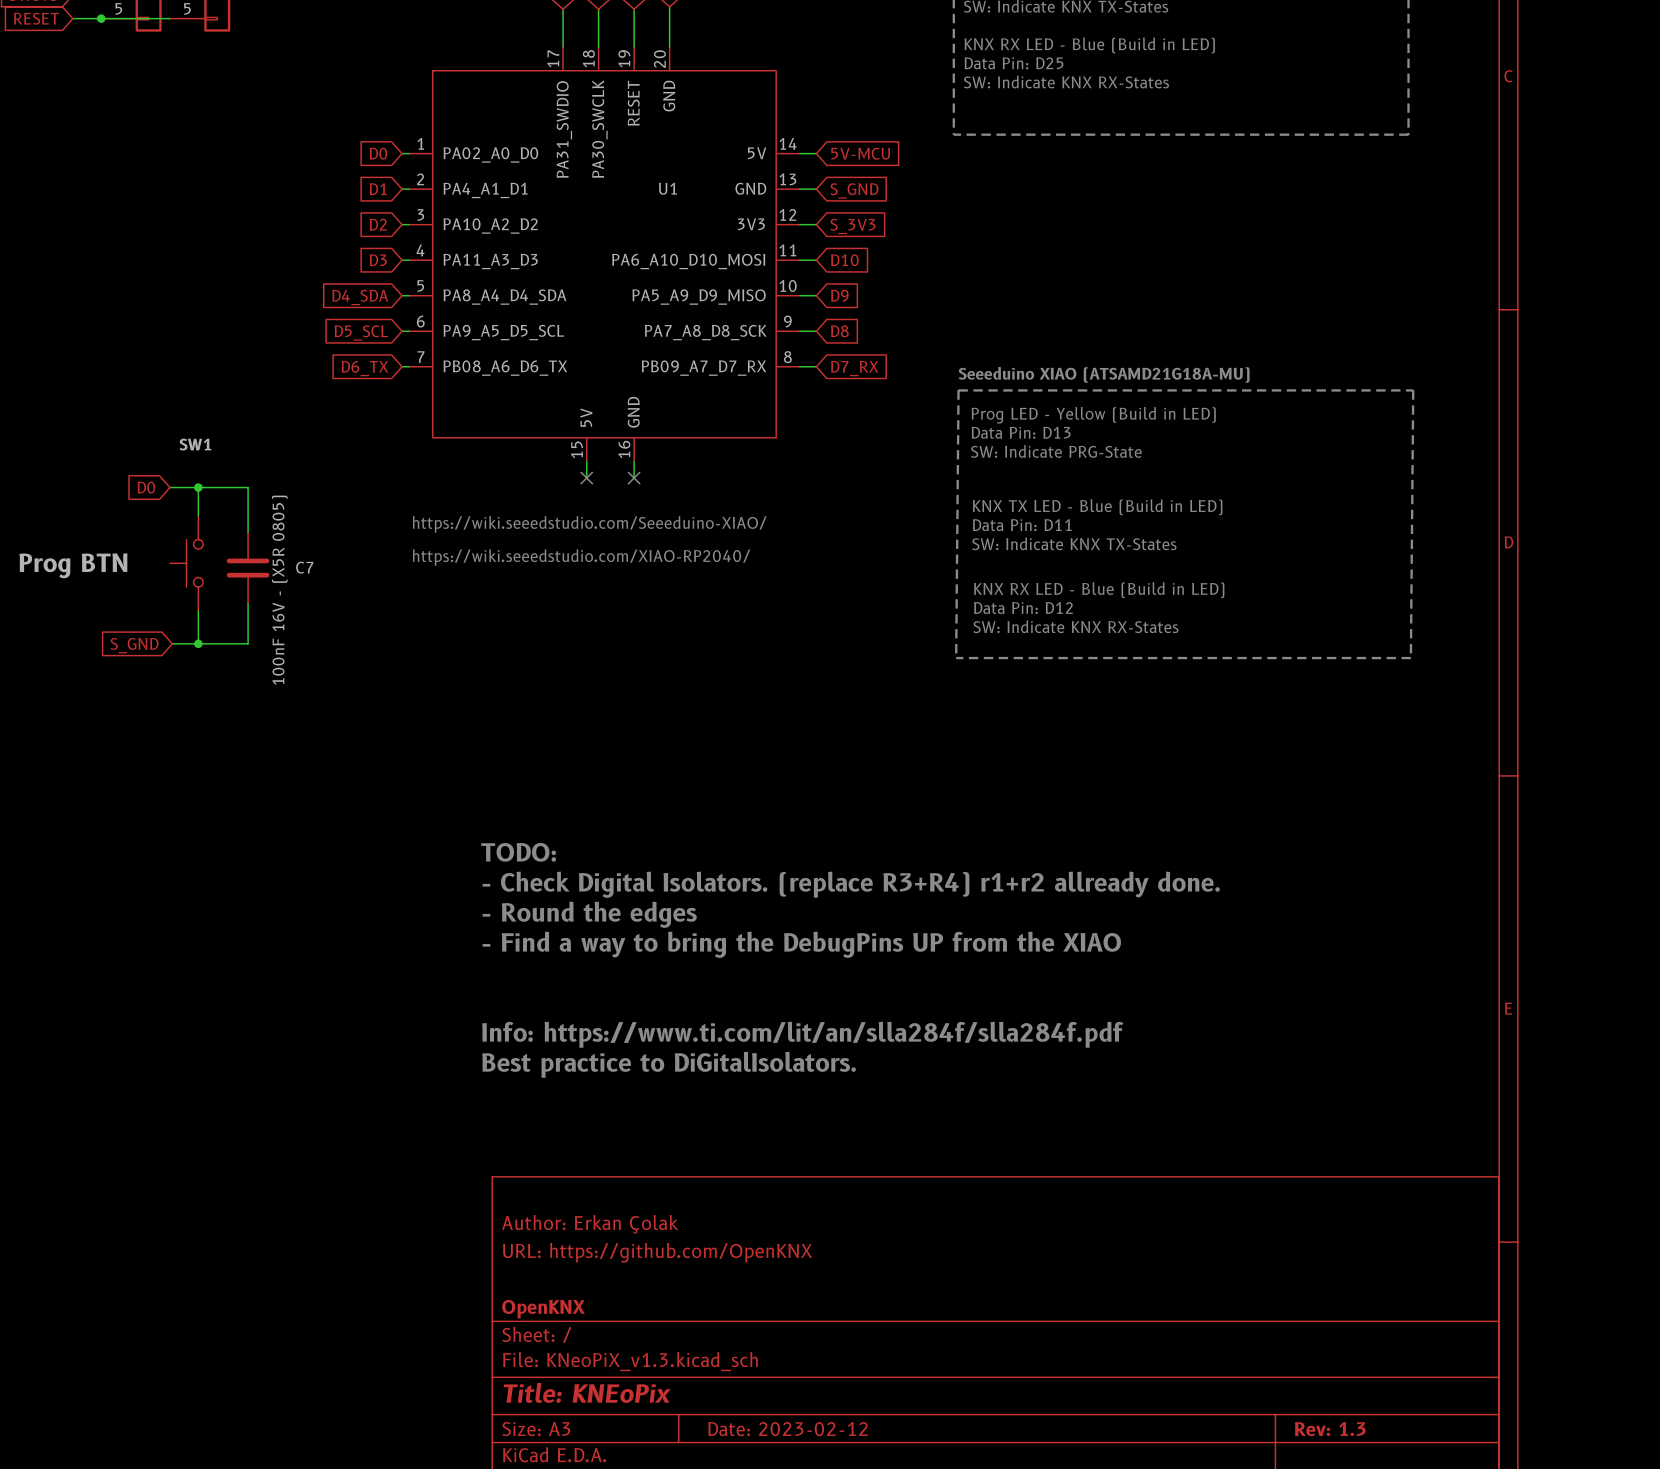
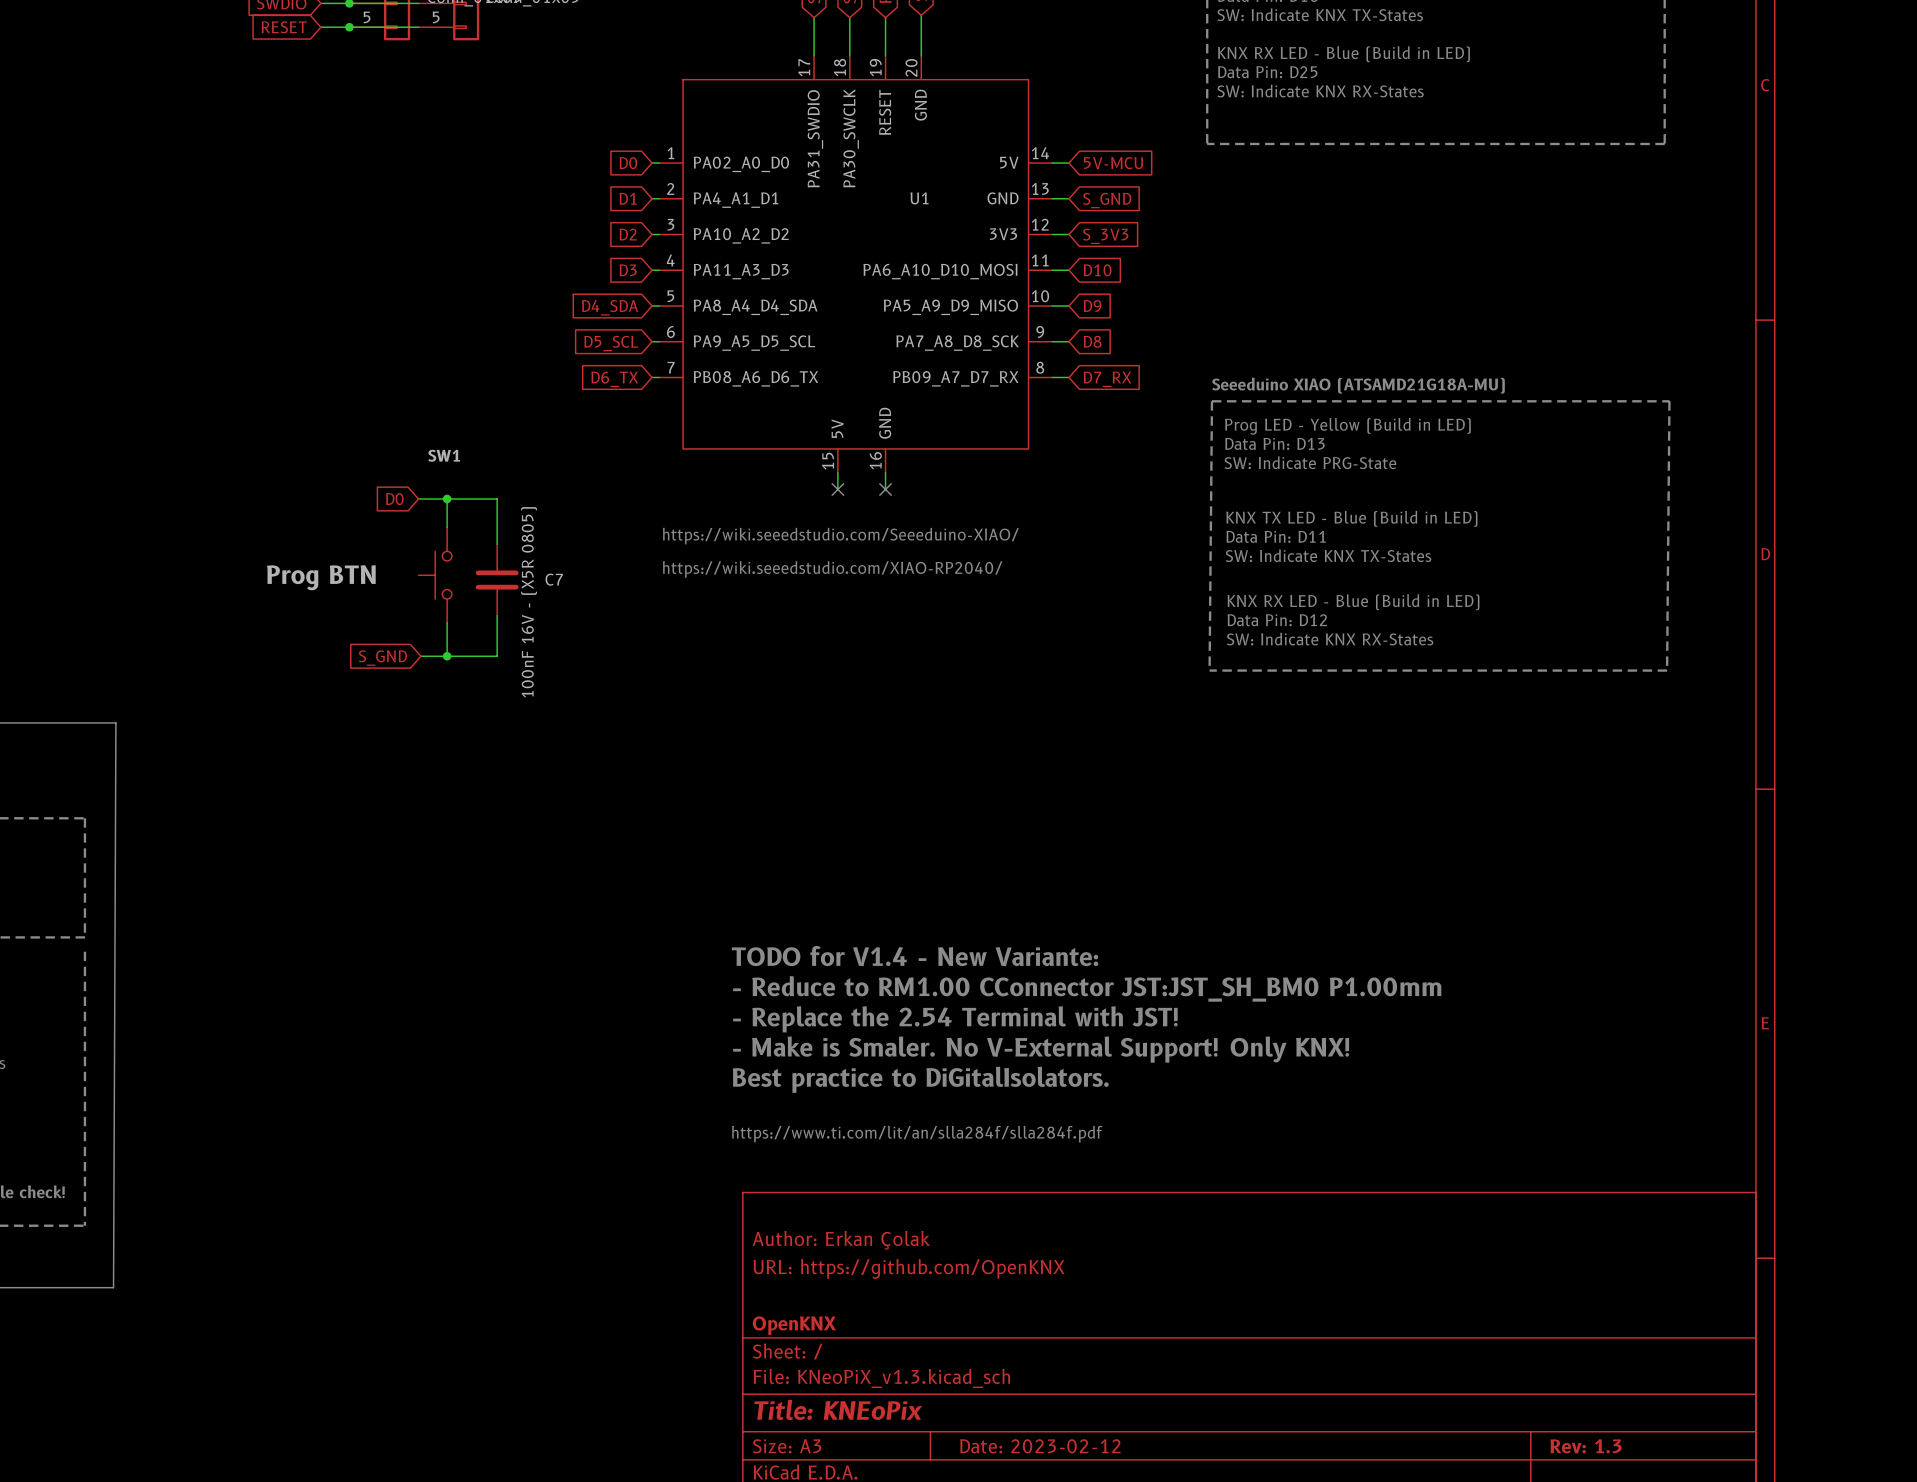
text: TODO: (518, 852) -> none
text: - Check Digital Isolators. (replace R3+R4) r1+r2 allready done. (851, 884) -> none
text: - Round the edges (589, 914) -> none
text: - Find a way to bring the DebugPins UP from the XIAO (801, 944) -> TODO for V1.4 - New Variante: (915, 956)
text: none -> - Reduce to RM1.00 CConnector JST:JST_SH_BM0 P1.00mm (1087, 988)
text: none -> - Replace the 2.54 Terminal with JST! (955, 1019)
text: Info: https://www.ti.com/lit/an/slla284f/slla284f.pdf (802, 1034) -> - Make is Smaler. No V-External Support! Only KNX! (1041, 1049)
text: none -> https://www.ti.com/lit/an/slla284f/slla284f.pdf (917, 1134)

